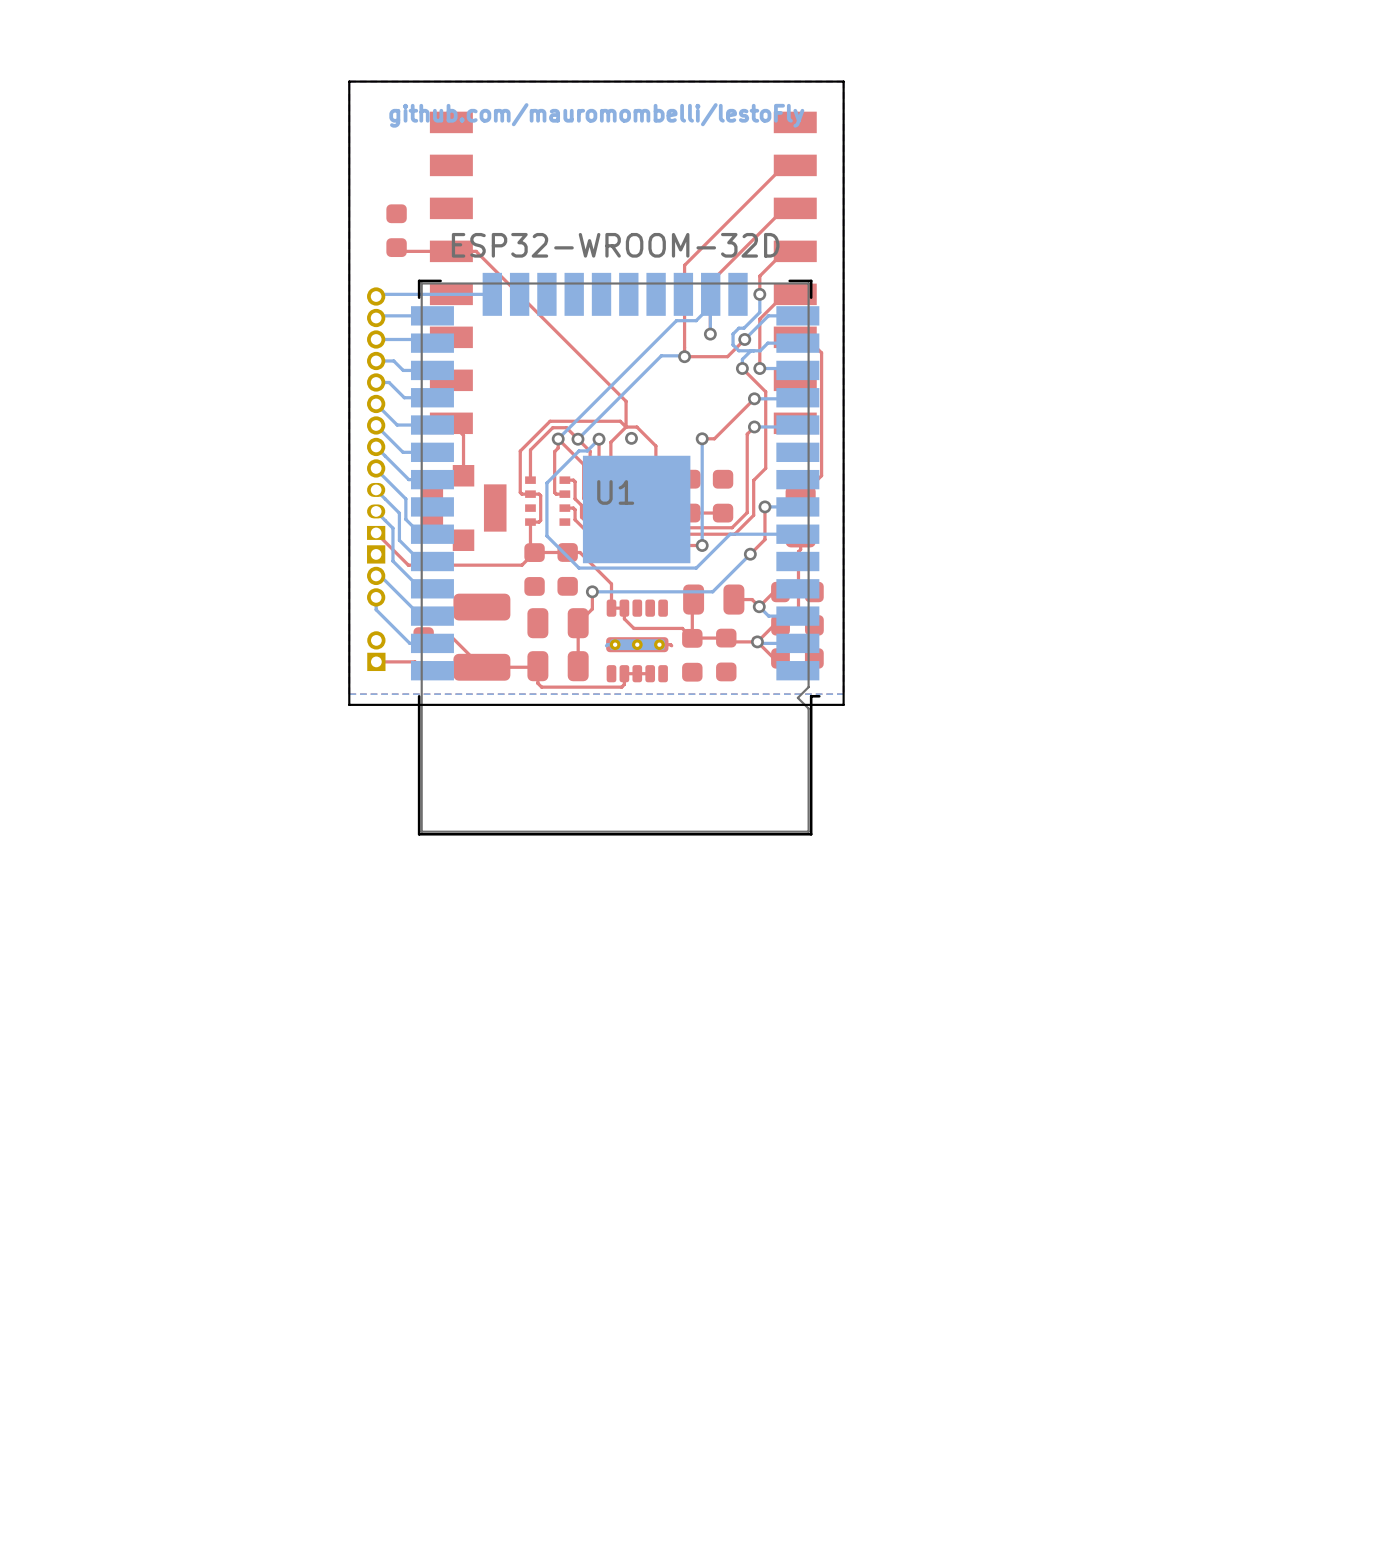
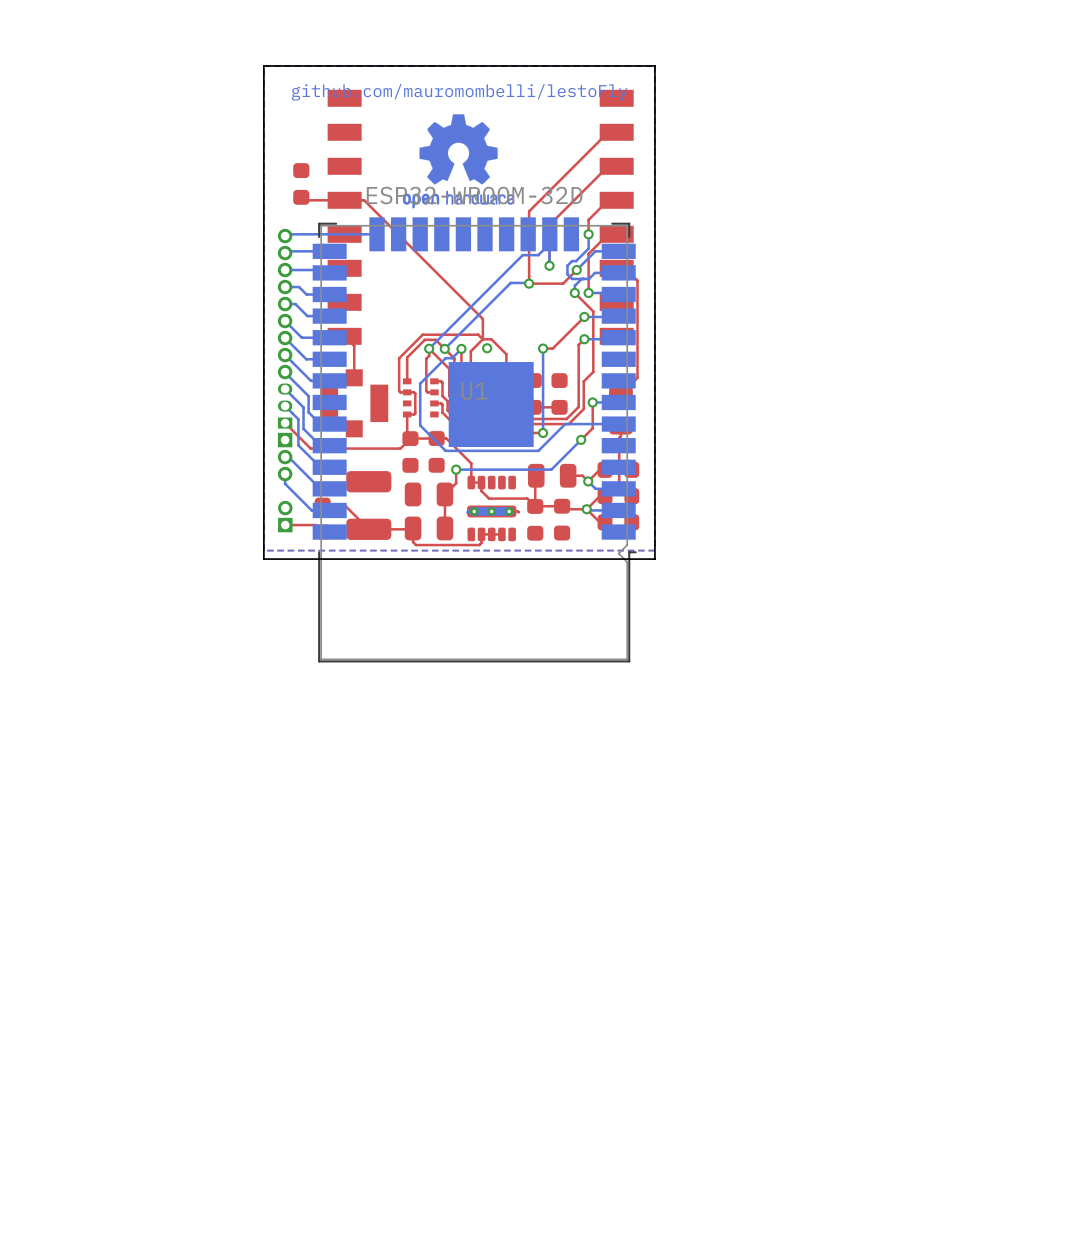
drawing: none -> [402, 114, 515, 209]

